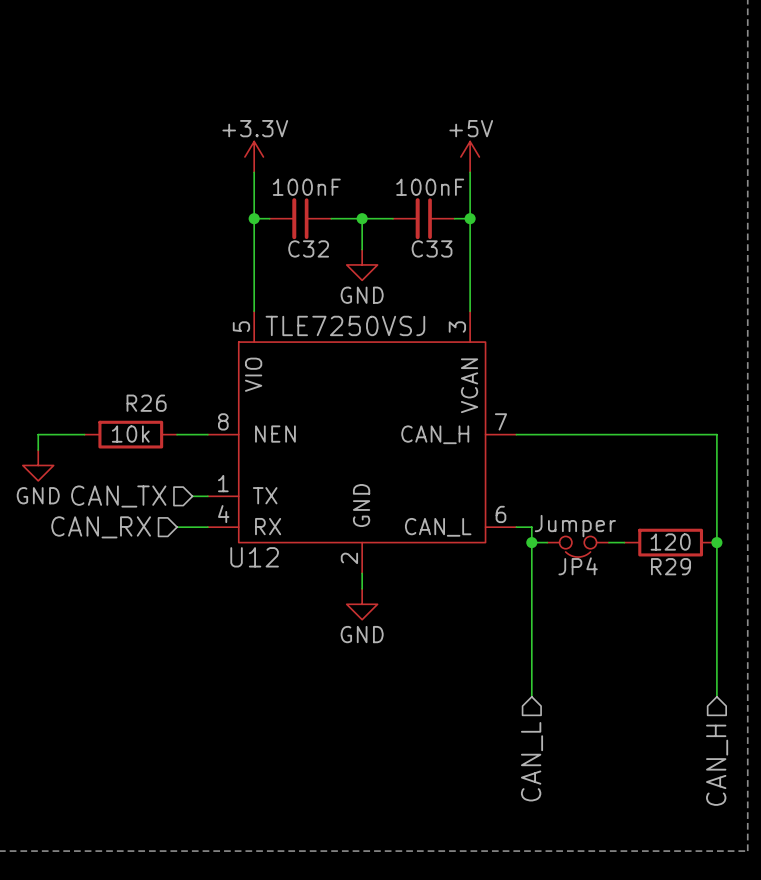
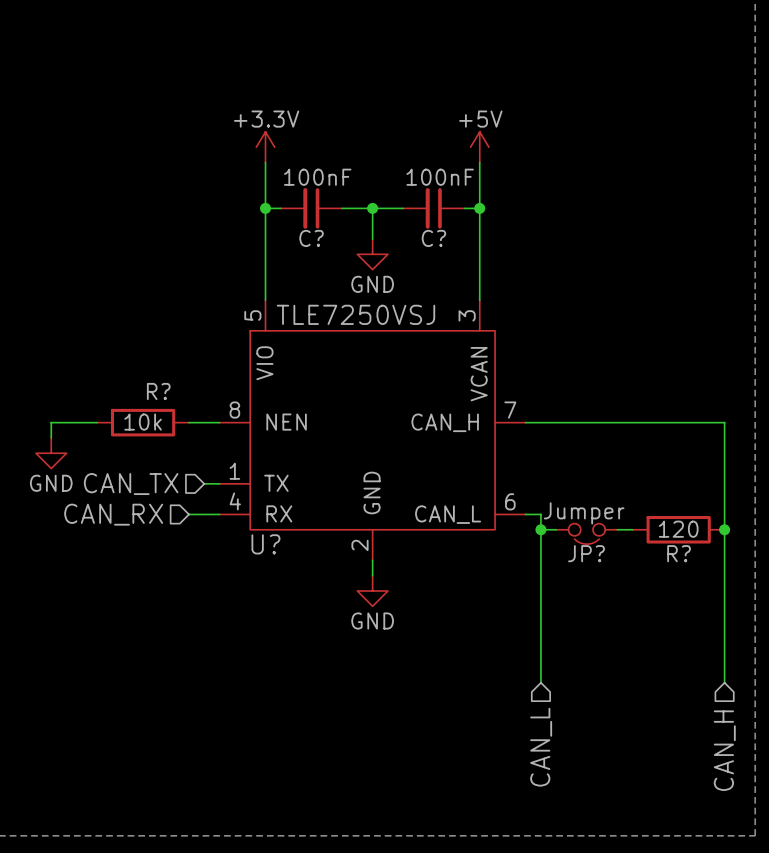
C32 name: C32 (308, 248) -> C? (311, 238)
C33 name: C33 (432, 248) -> C? (433, 238)
R26 name: R26 (146, 403) -> R? (158, 391)
U12 name: U12 (254, 557) -> U? (265, 544)
JP4 name: JP4 (578, 566) -> JP? (586, 553)
R29 name: R29 (671, 566) -> R? (679, 553)

